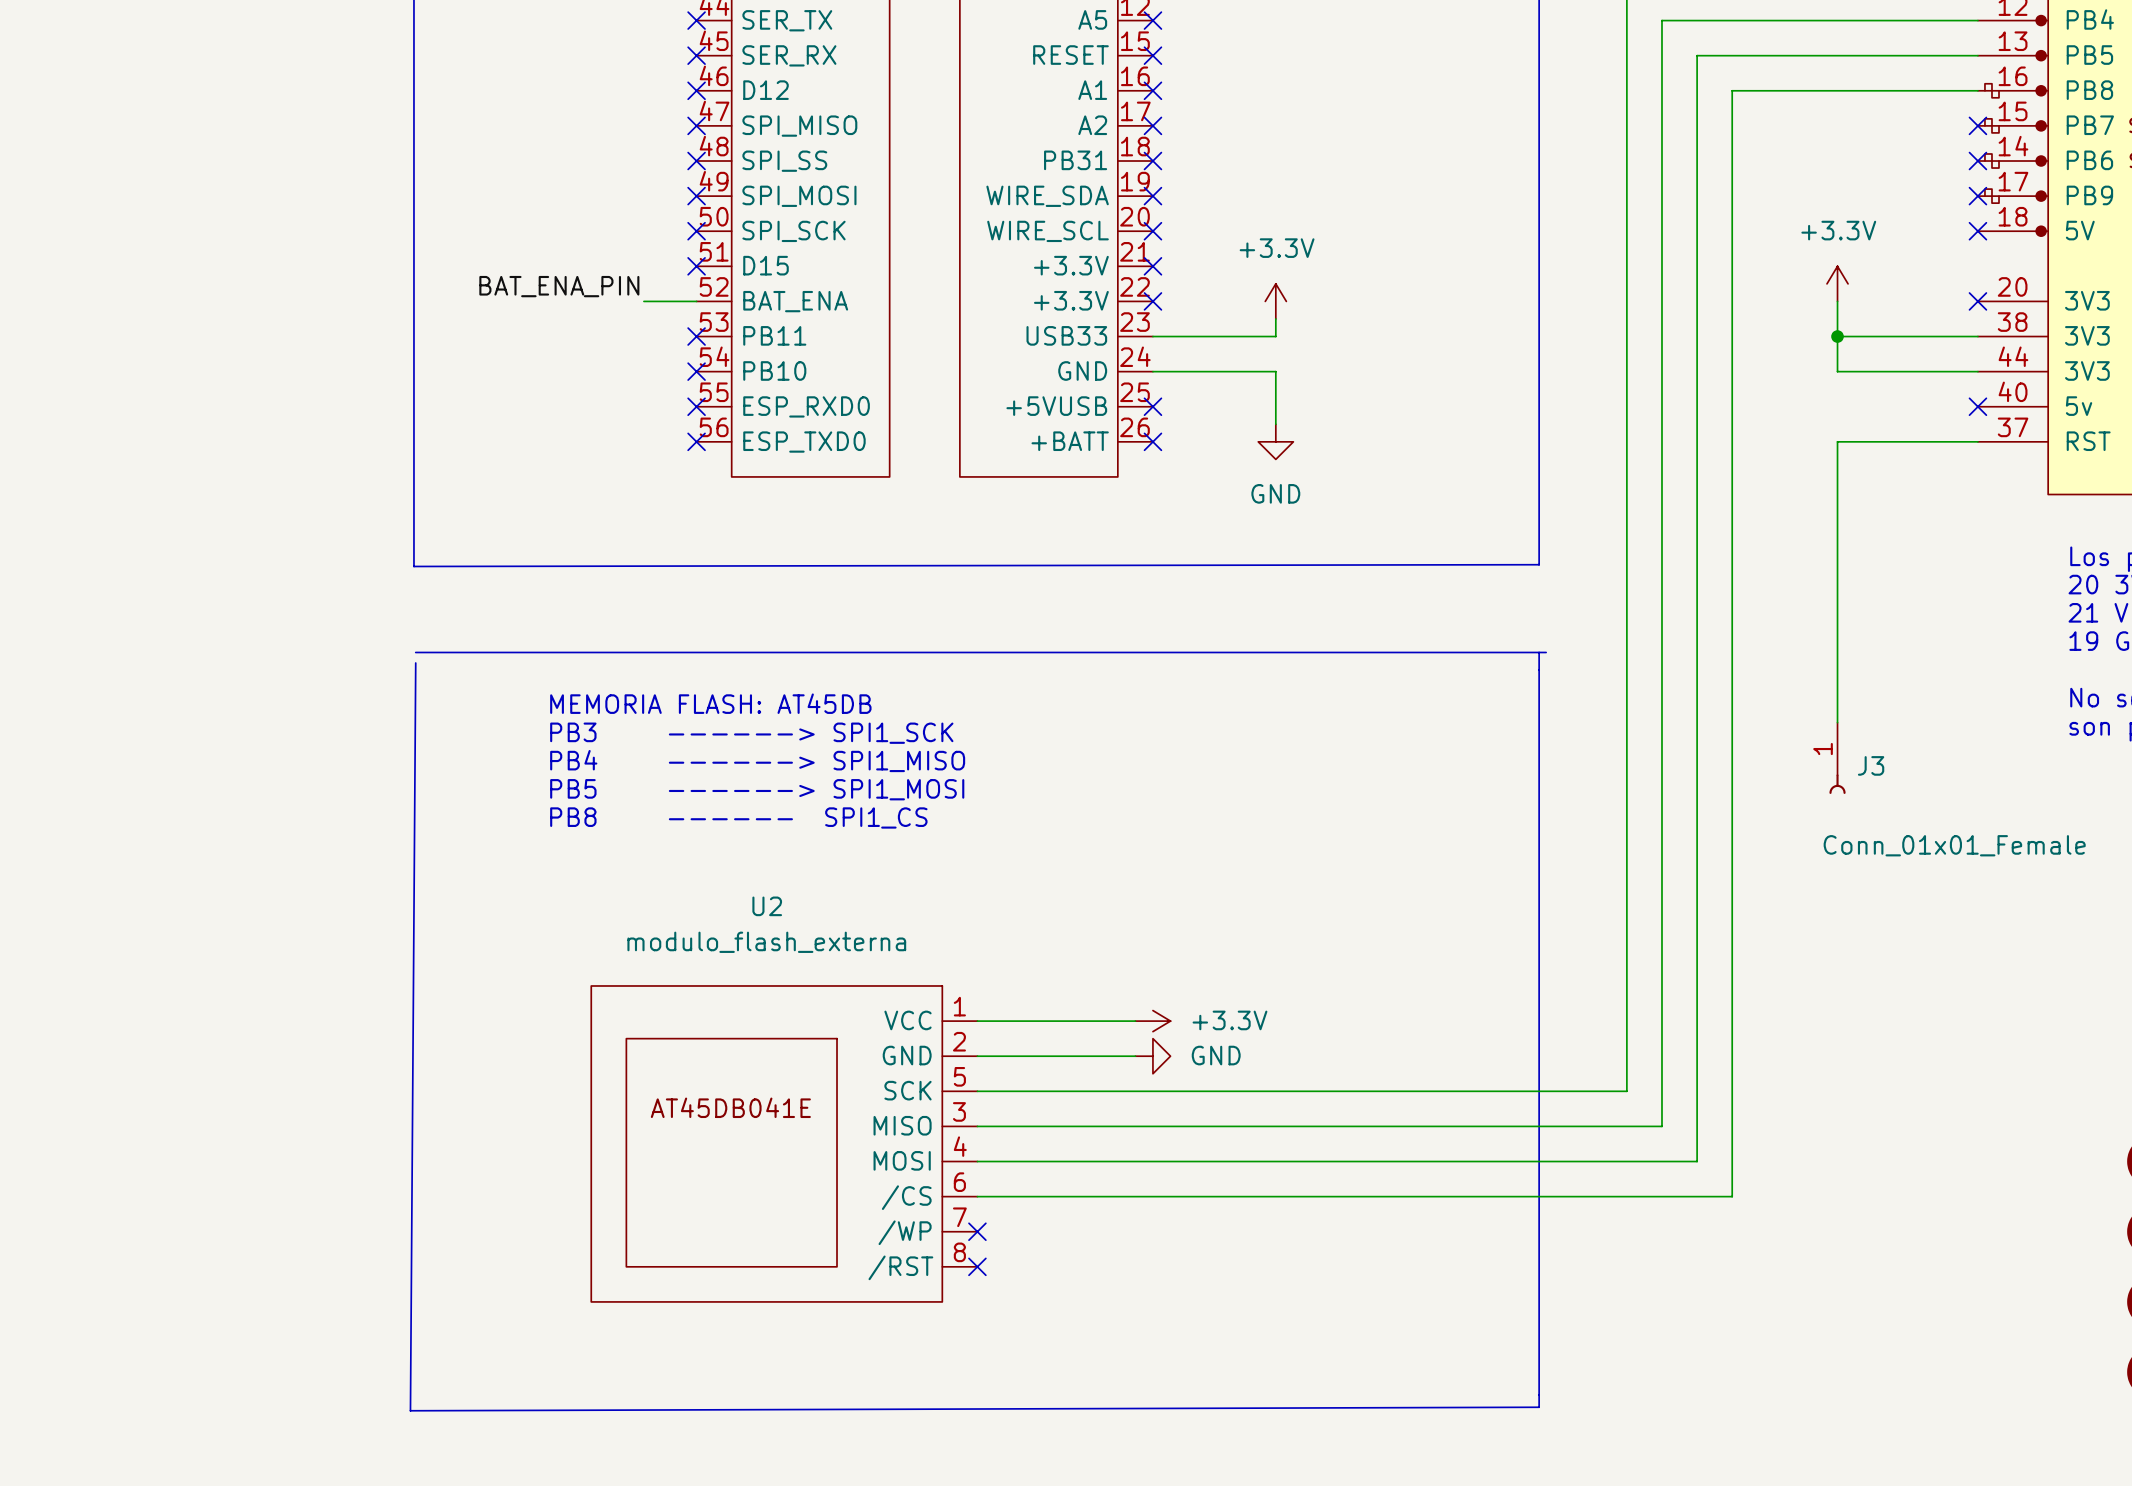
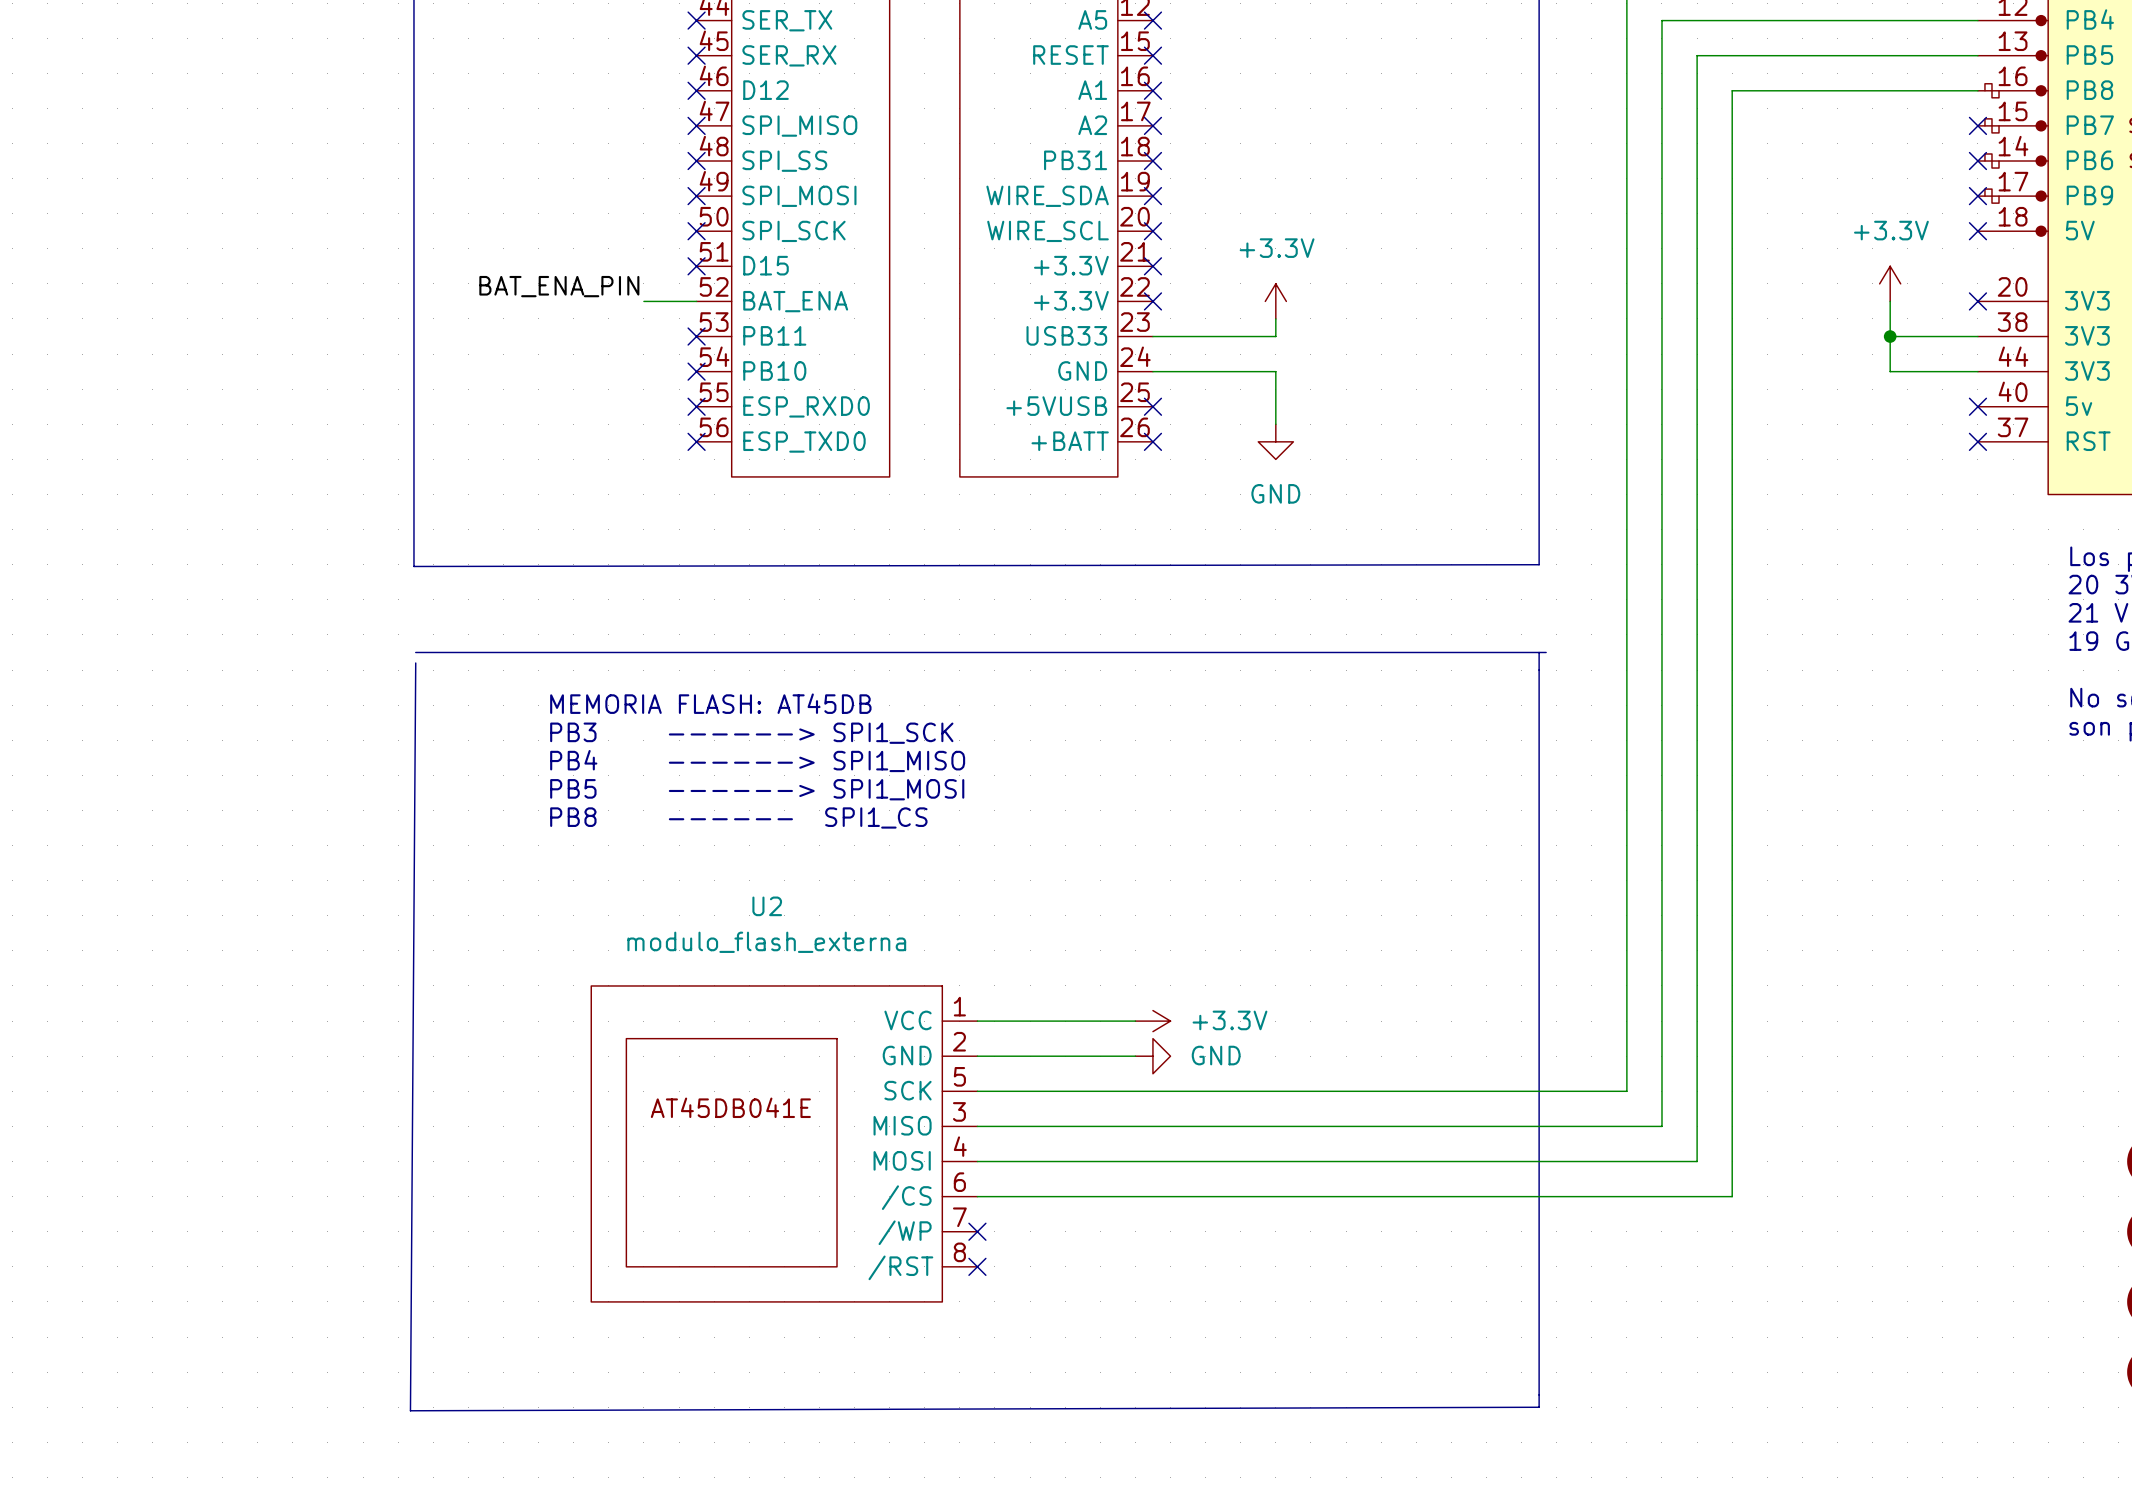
power symbol position: +3.3V (1837, 283) -> +3.3V (1890, 283)
wire: (1837, 301) (1837, 371) (1890, 371) -> (1890, 301) (1890, 371)
wire: (1837, 336) (1890, 336) -> none
junction position: (1837, 336) -> (1890, 336)
wire: (1977, 441) (1837, 441) (1837, 722) -> none
no-connect mark: none -> (1977, 441)
J3: Conn_01x01_Female (1837, 758) -> none

